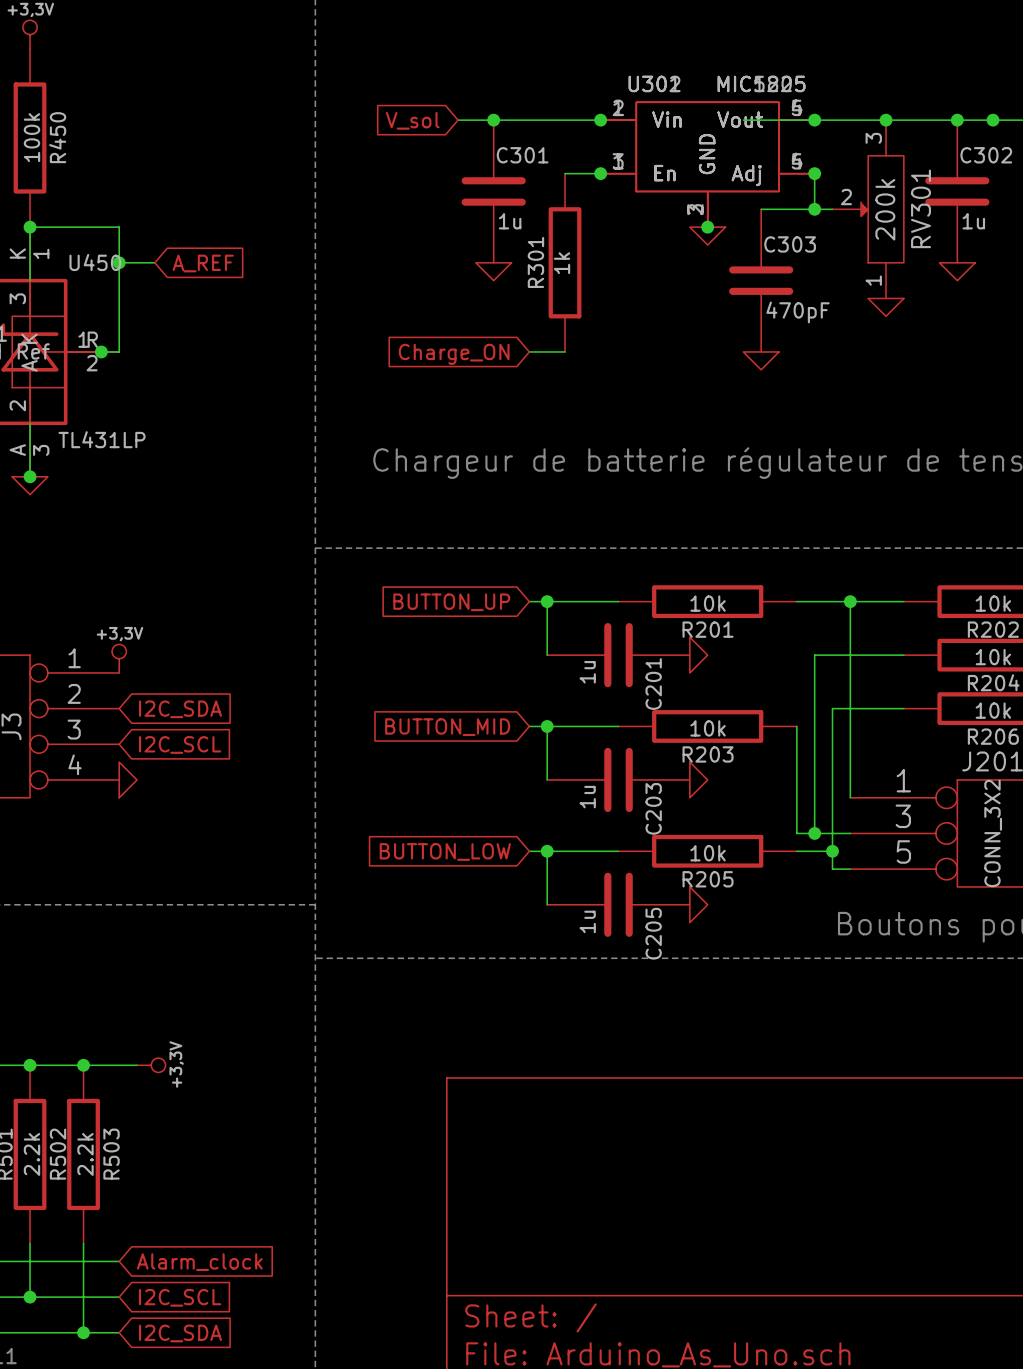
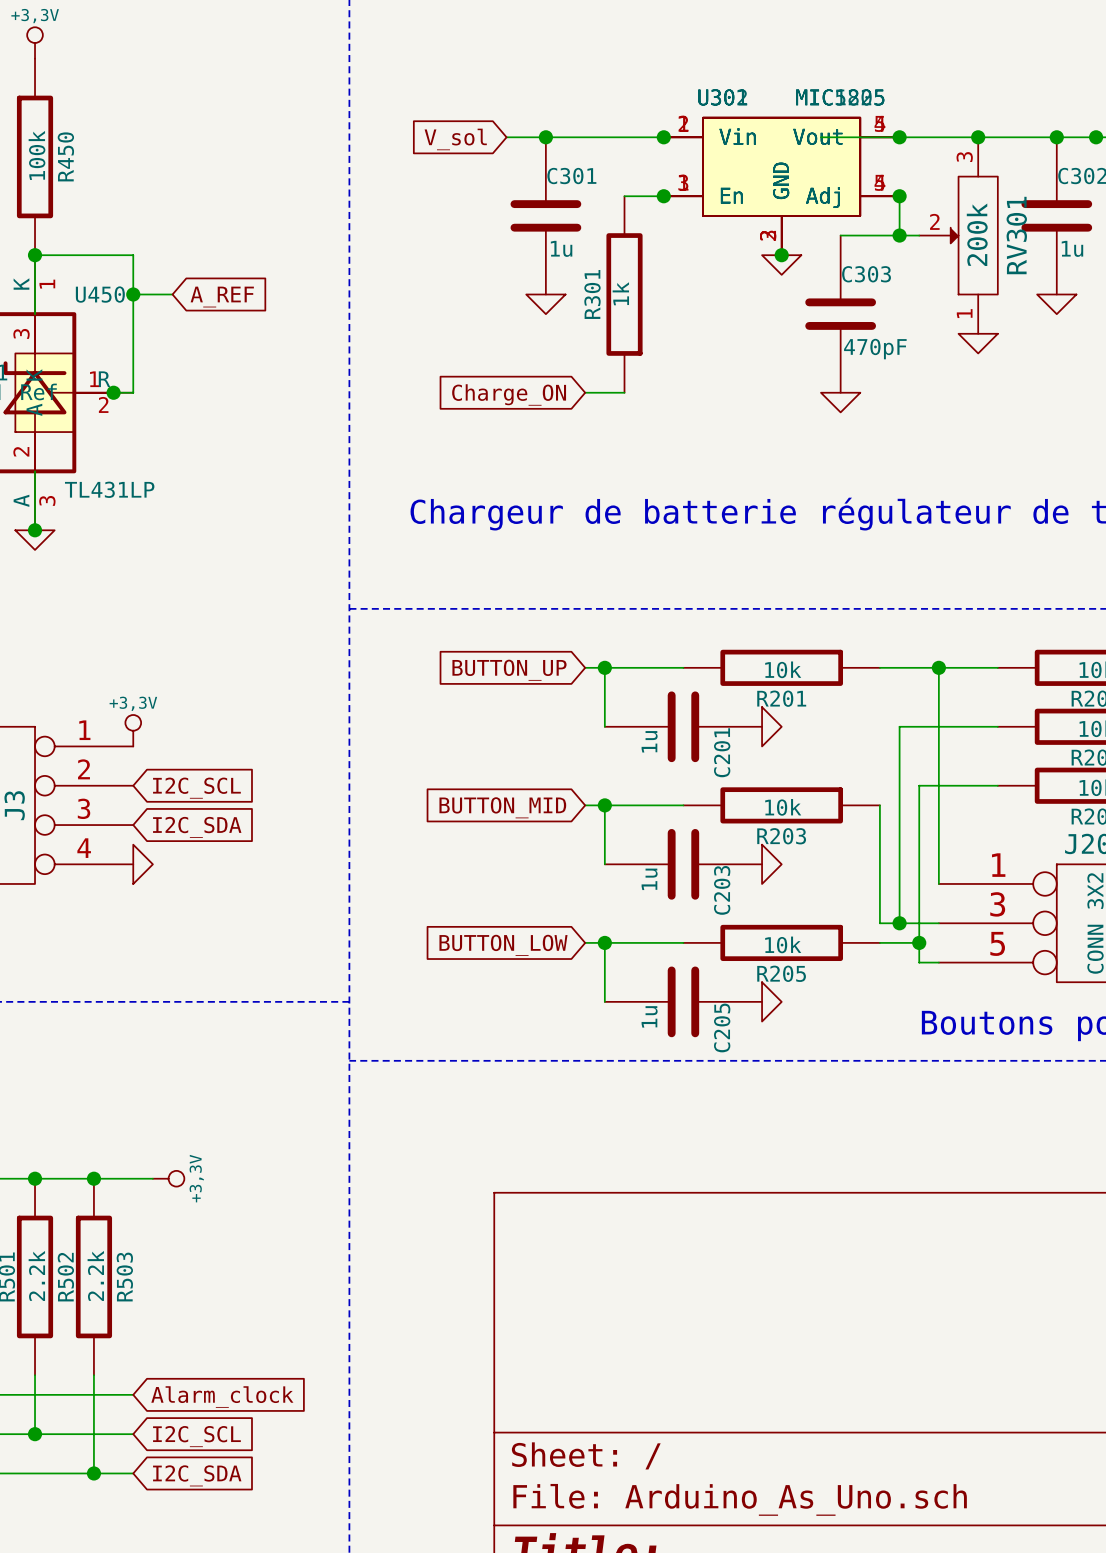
global label: I2C_SDA (180, 709) -> I2C_SCL (196, 788)
global label: I2C_SCL (180, 744) -> I2C_SDA (197, 827)

